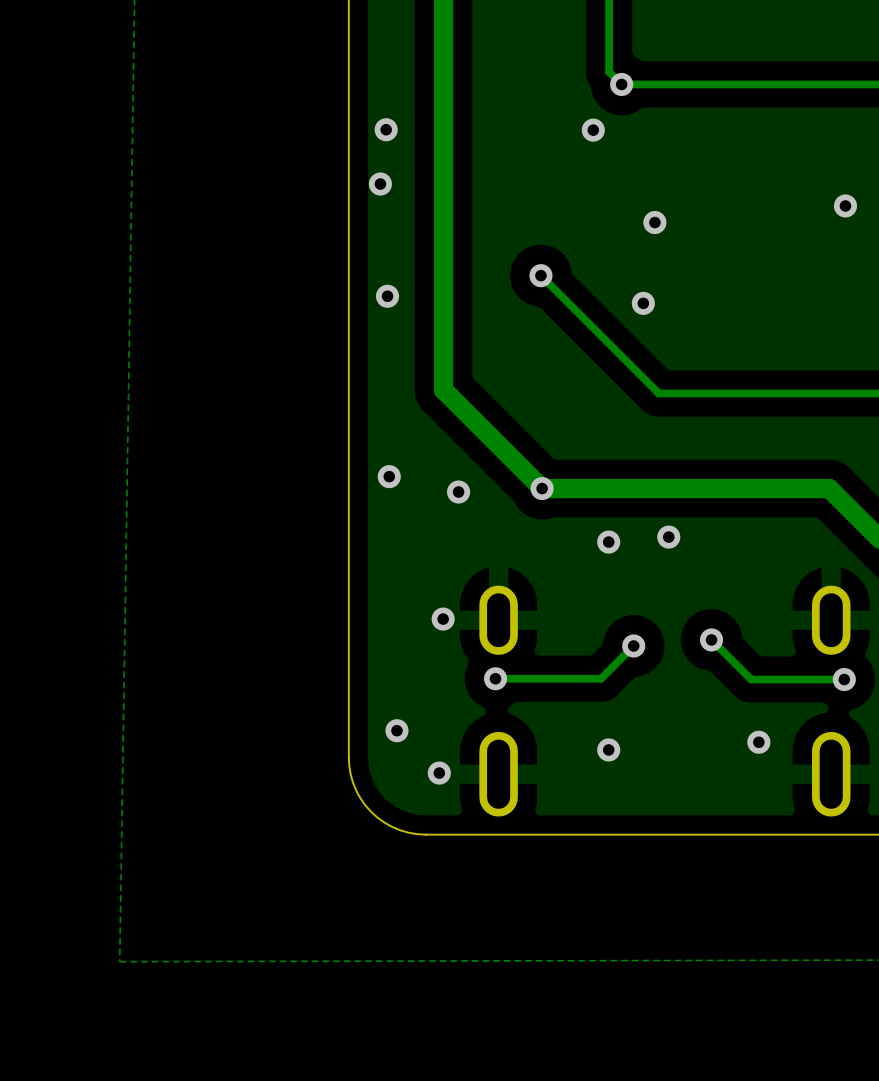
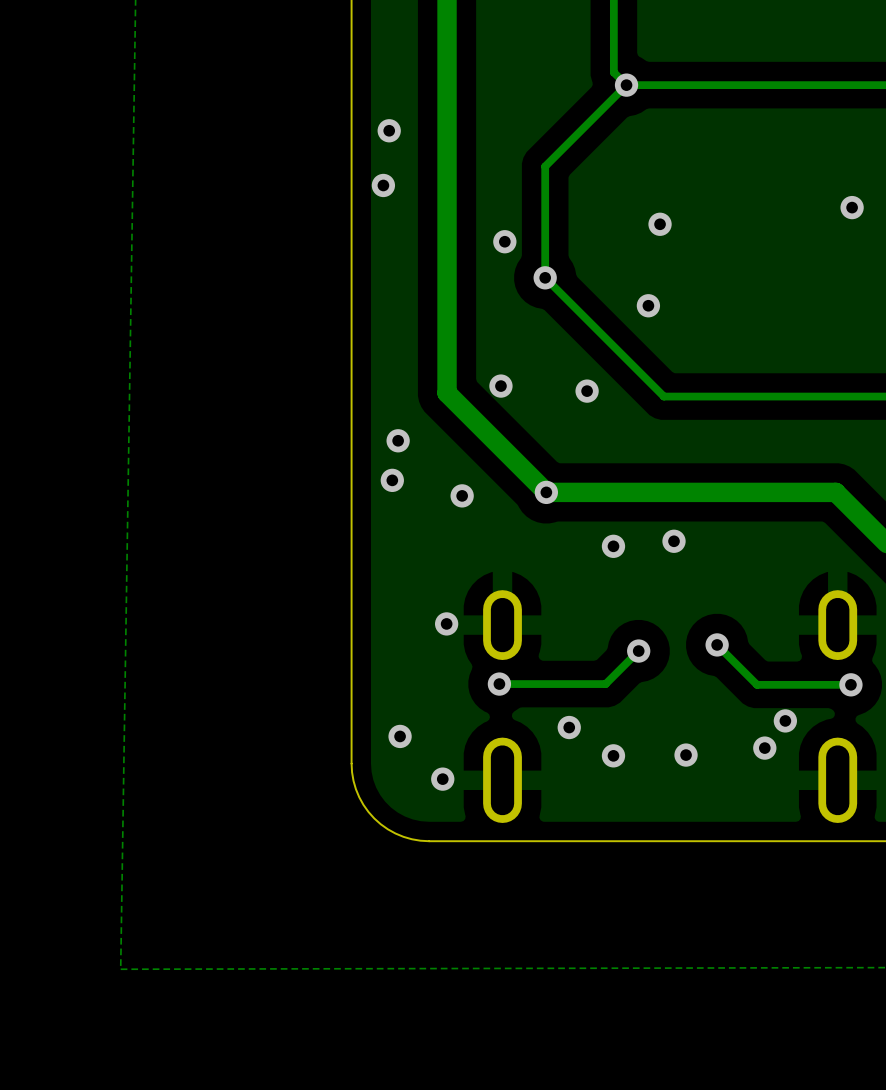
track: none -> (626, 85) (545, 166) (545, 277)
via: (593, 130) -> none
via: none -> (504, 241)
via: (387, 296) -> none
via: none -> (500, 386)
via: none -> (587, 391)
via: none -> (398, 440)
via: none -> (785, 720)
via: none -> (569, 727)
via: none -> (686, 755)

